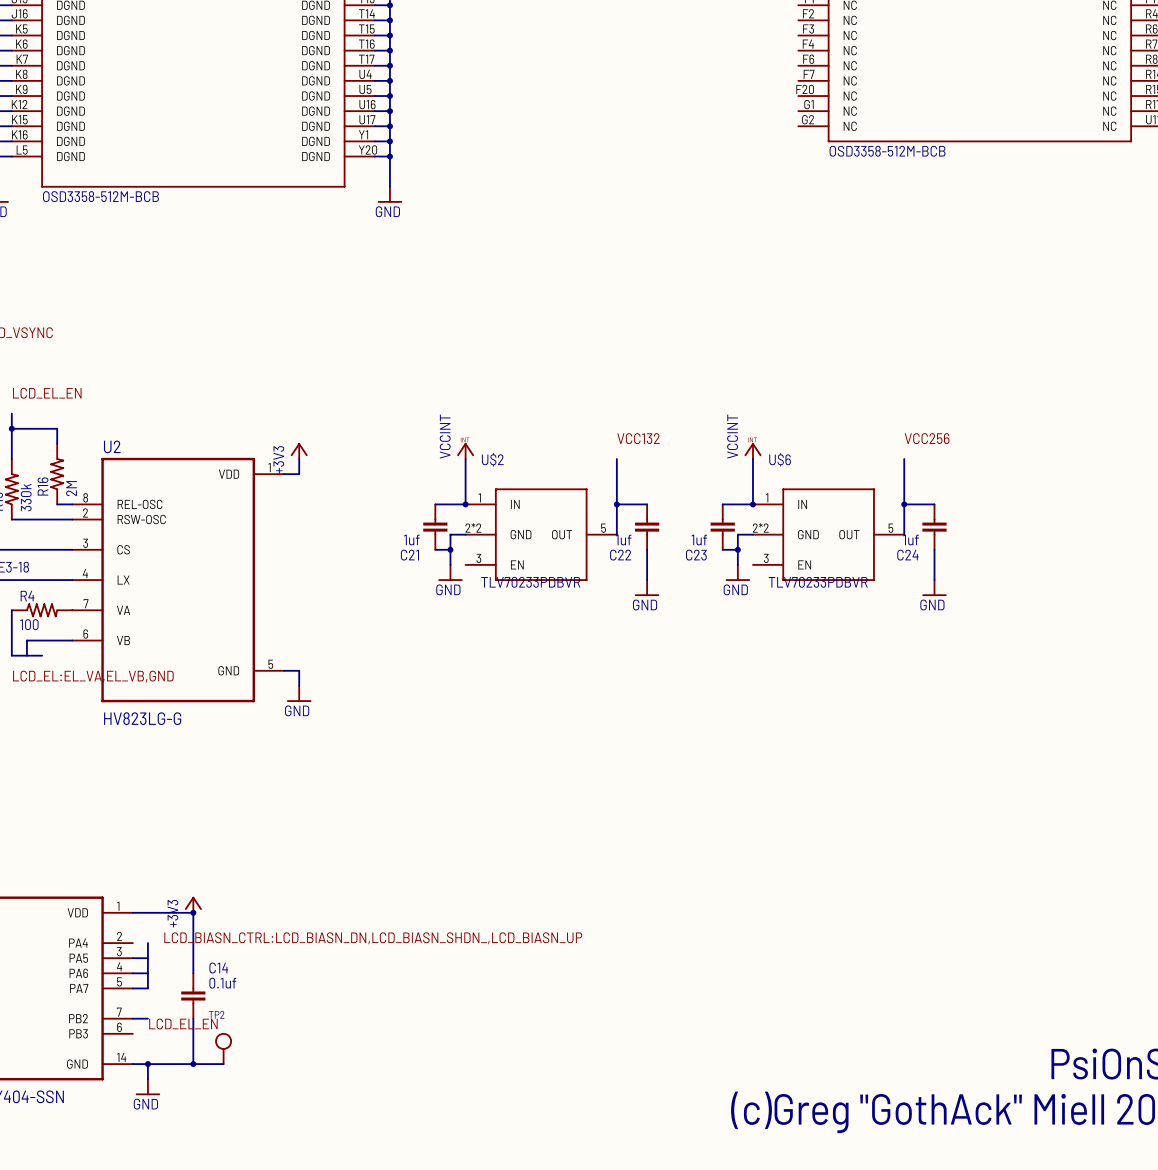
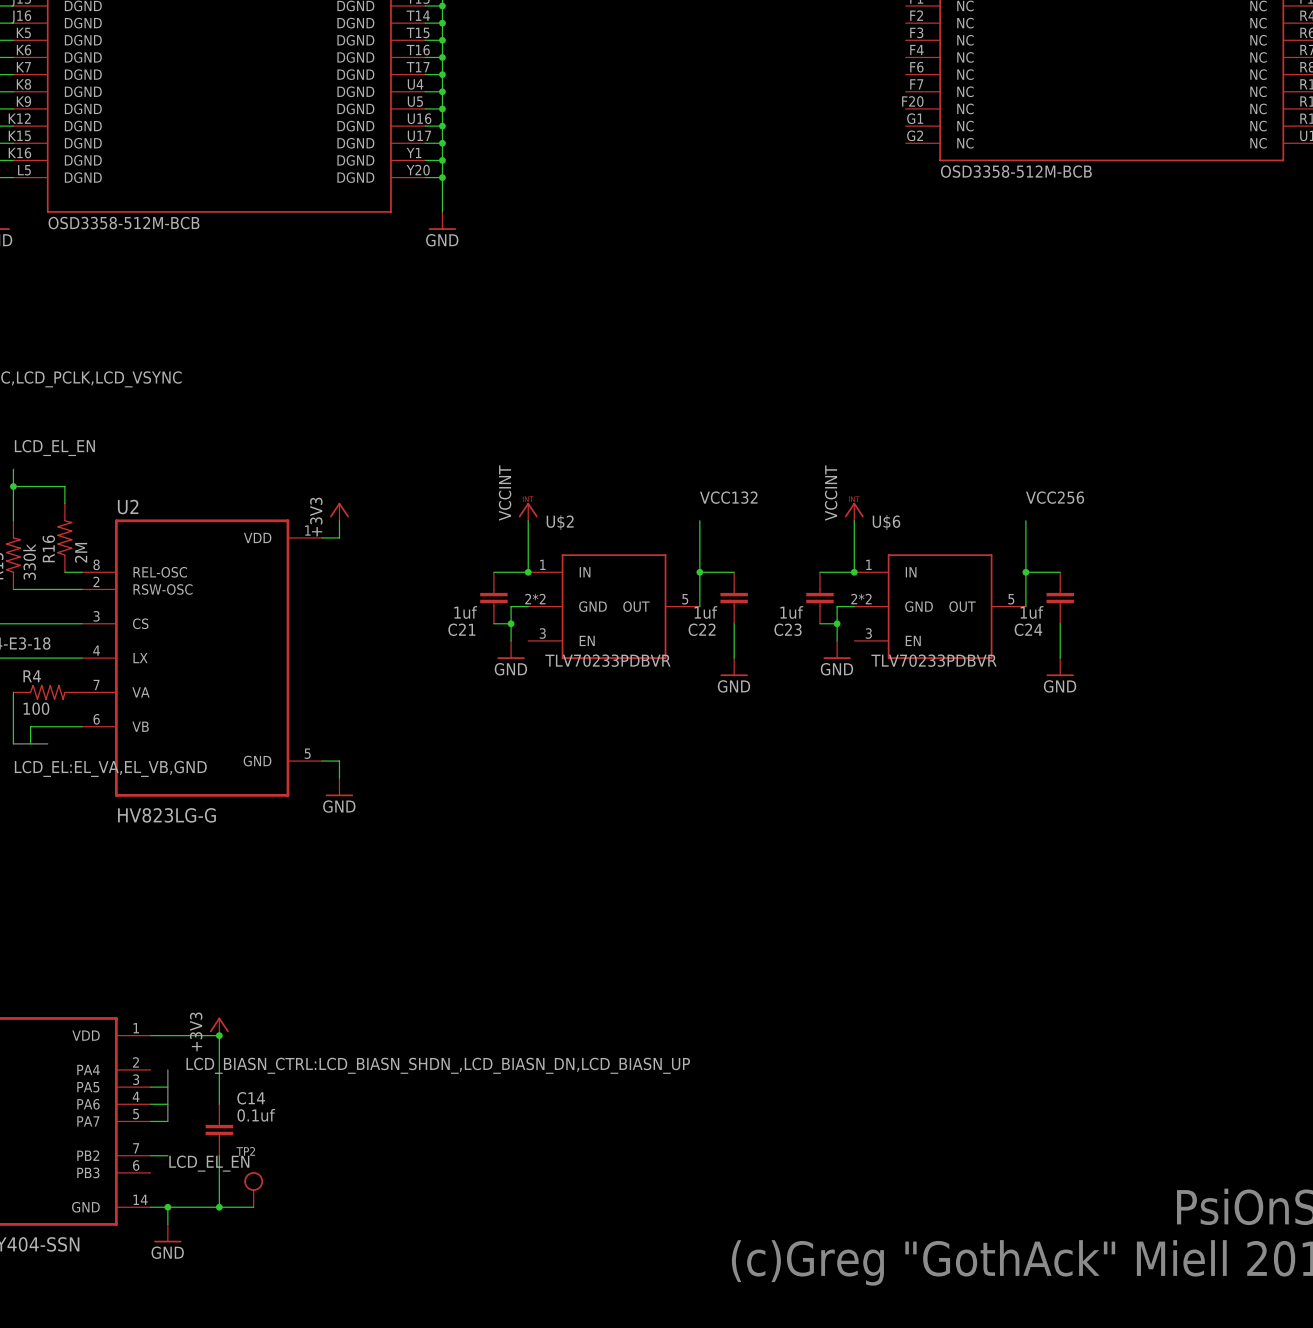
label: LCD_BIASN_CTRL:LCD_BIASN_DN,LCD_BIASN_SHDN_,LCD_BIASN_UP (373, 938) -> LCD_BIASN_CTRL:LCD_BIASN_SHDN_,LCD_BIASN_DN,LCD_BIASN_UP (438, 1065)

